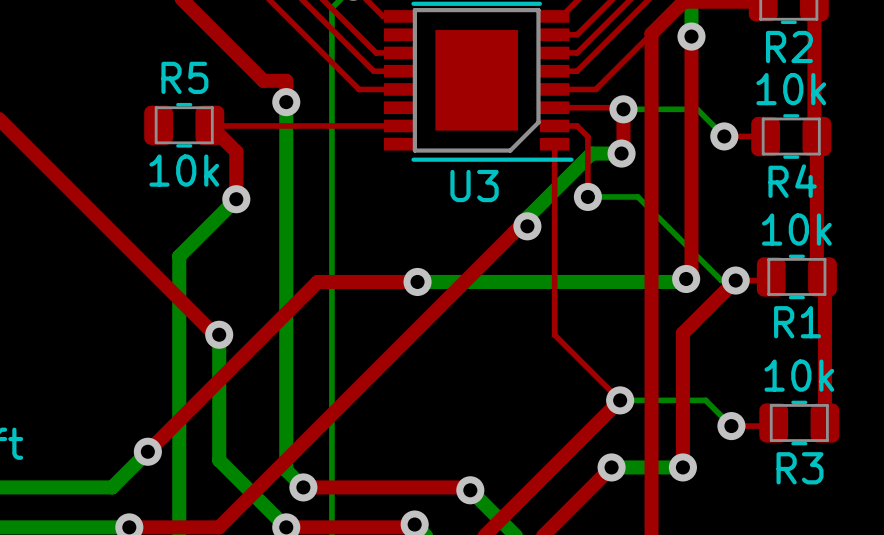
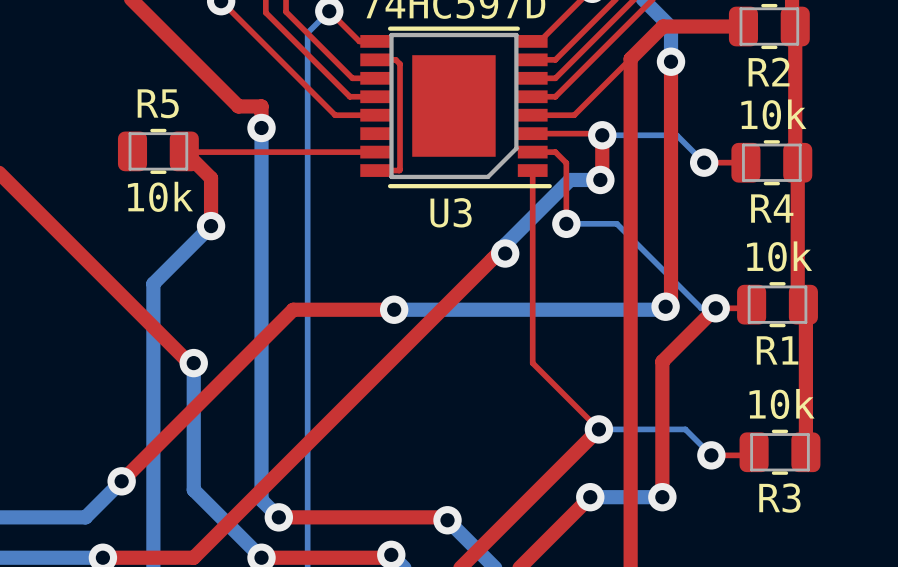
top track: none -> (375, 59) (395, 59) (400, 64) (400, 169) (375, 170)

